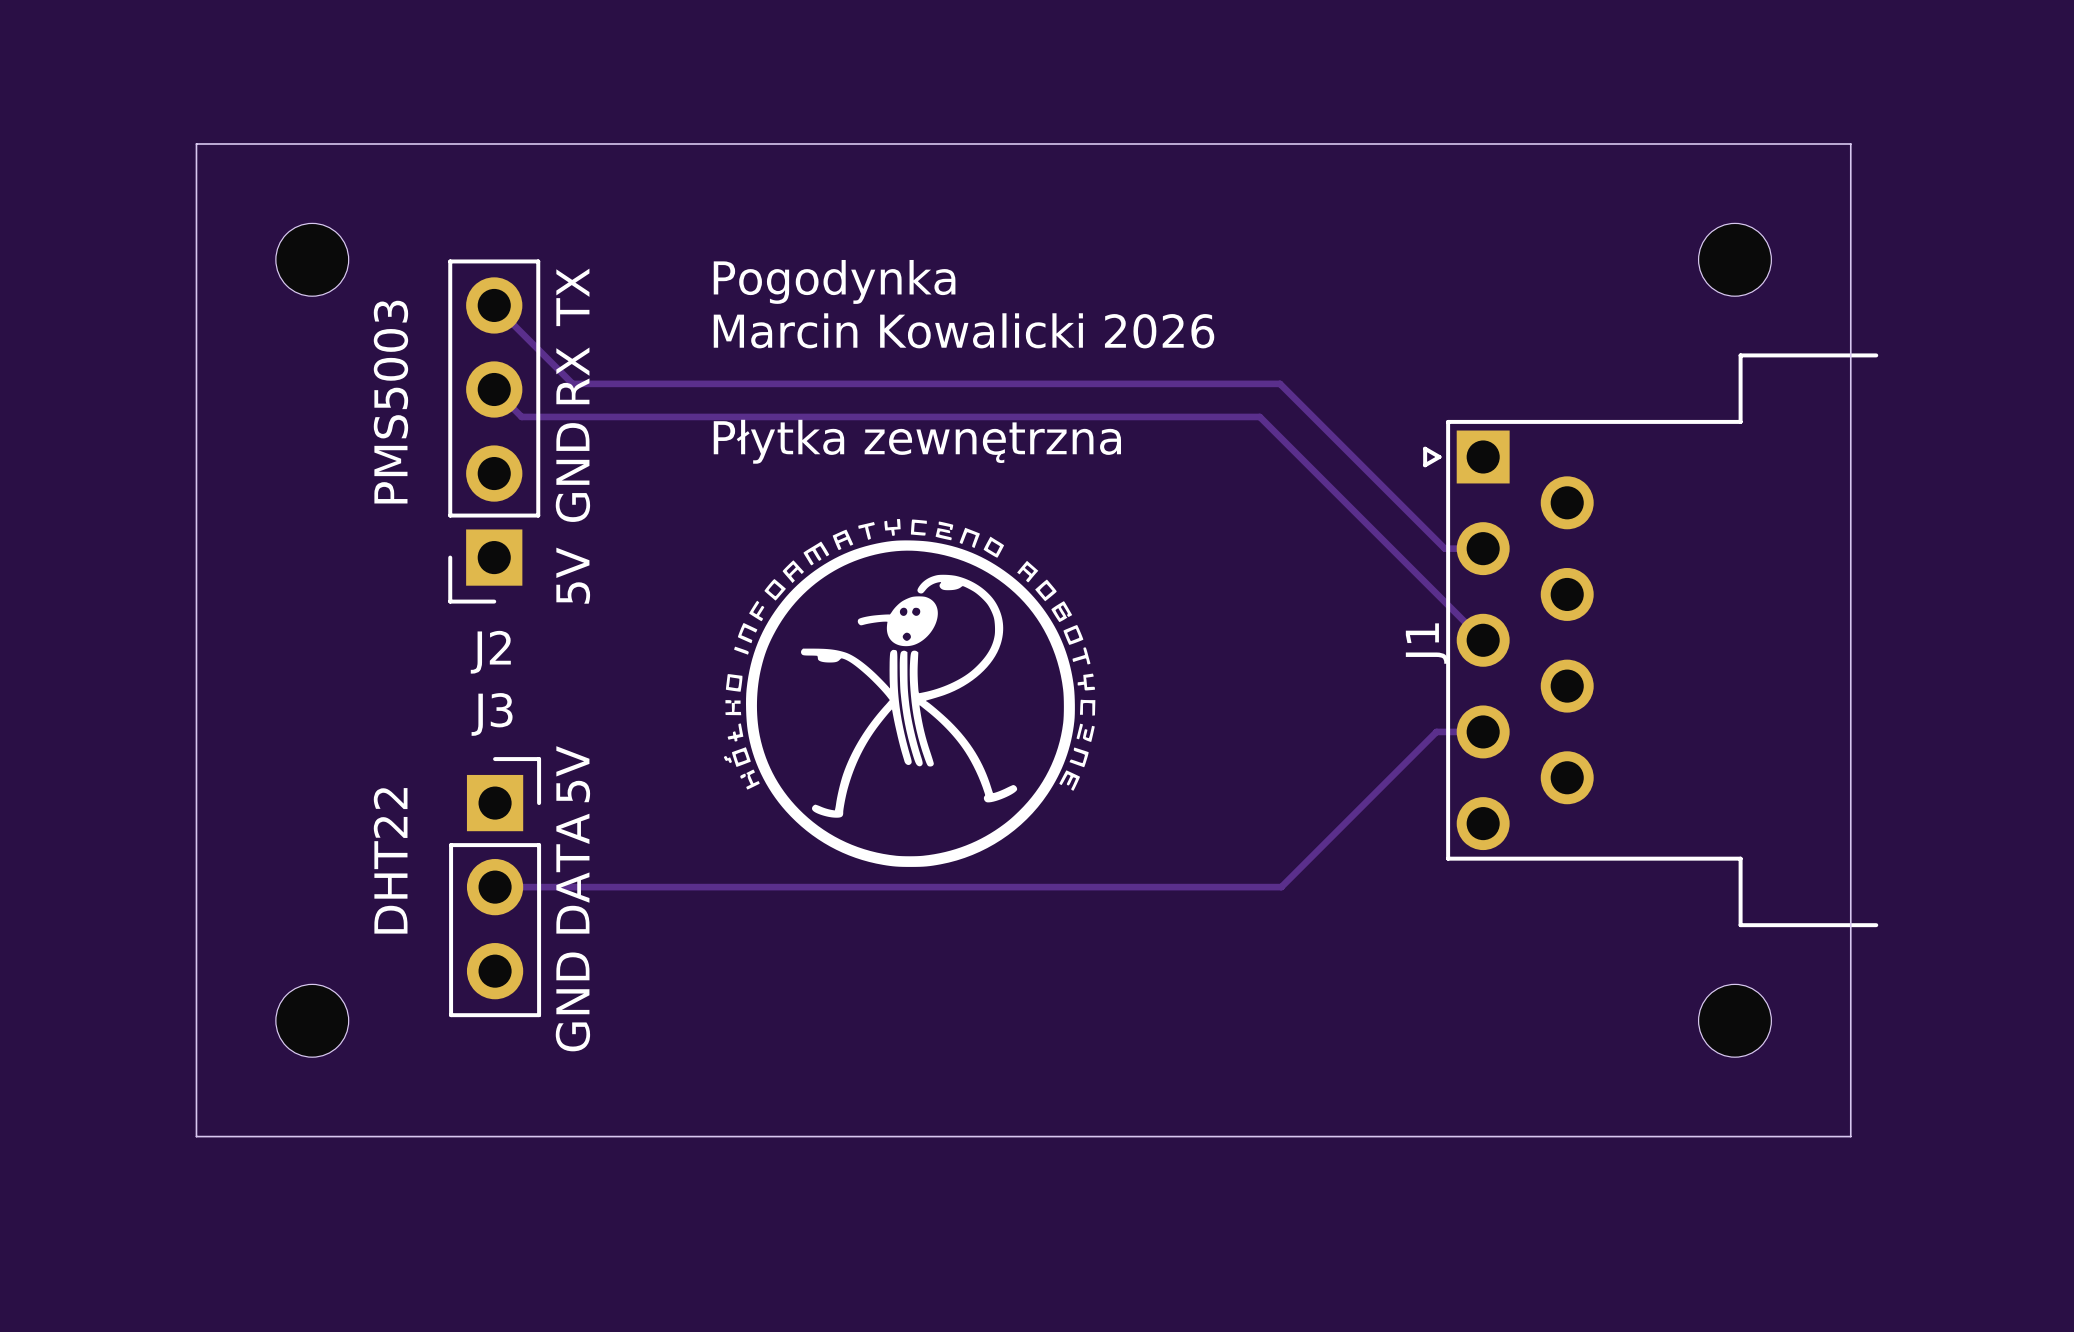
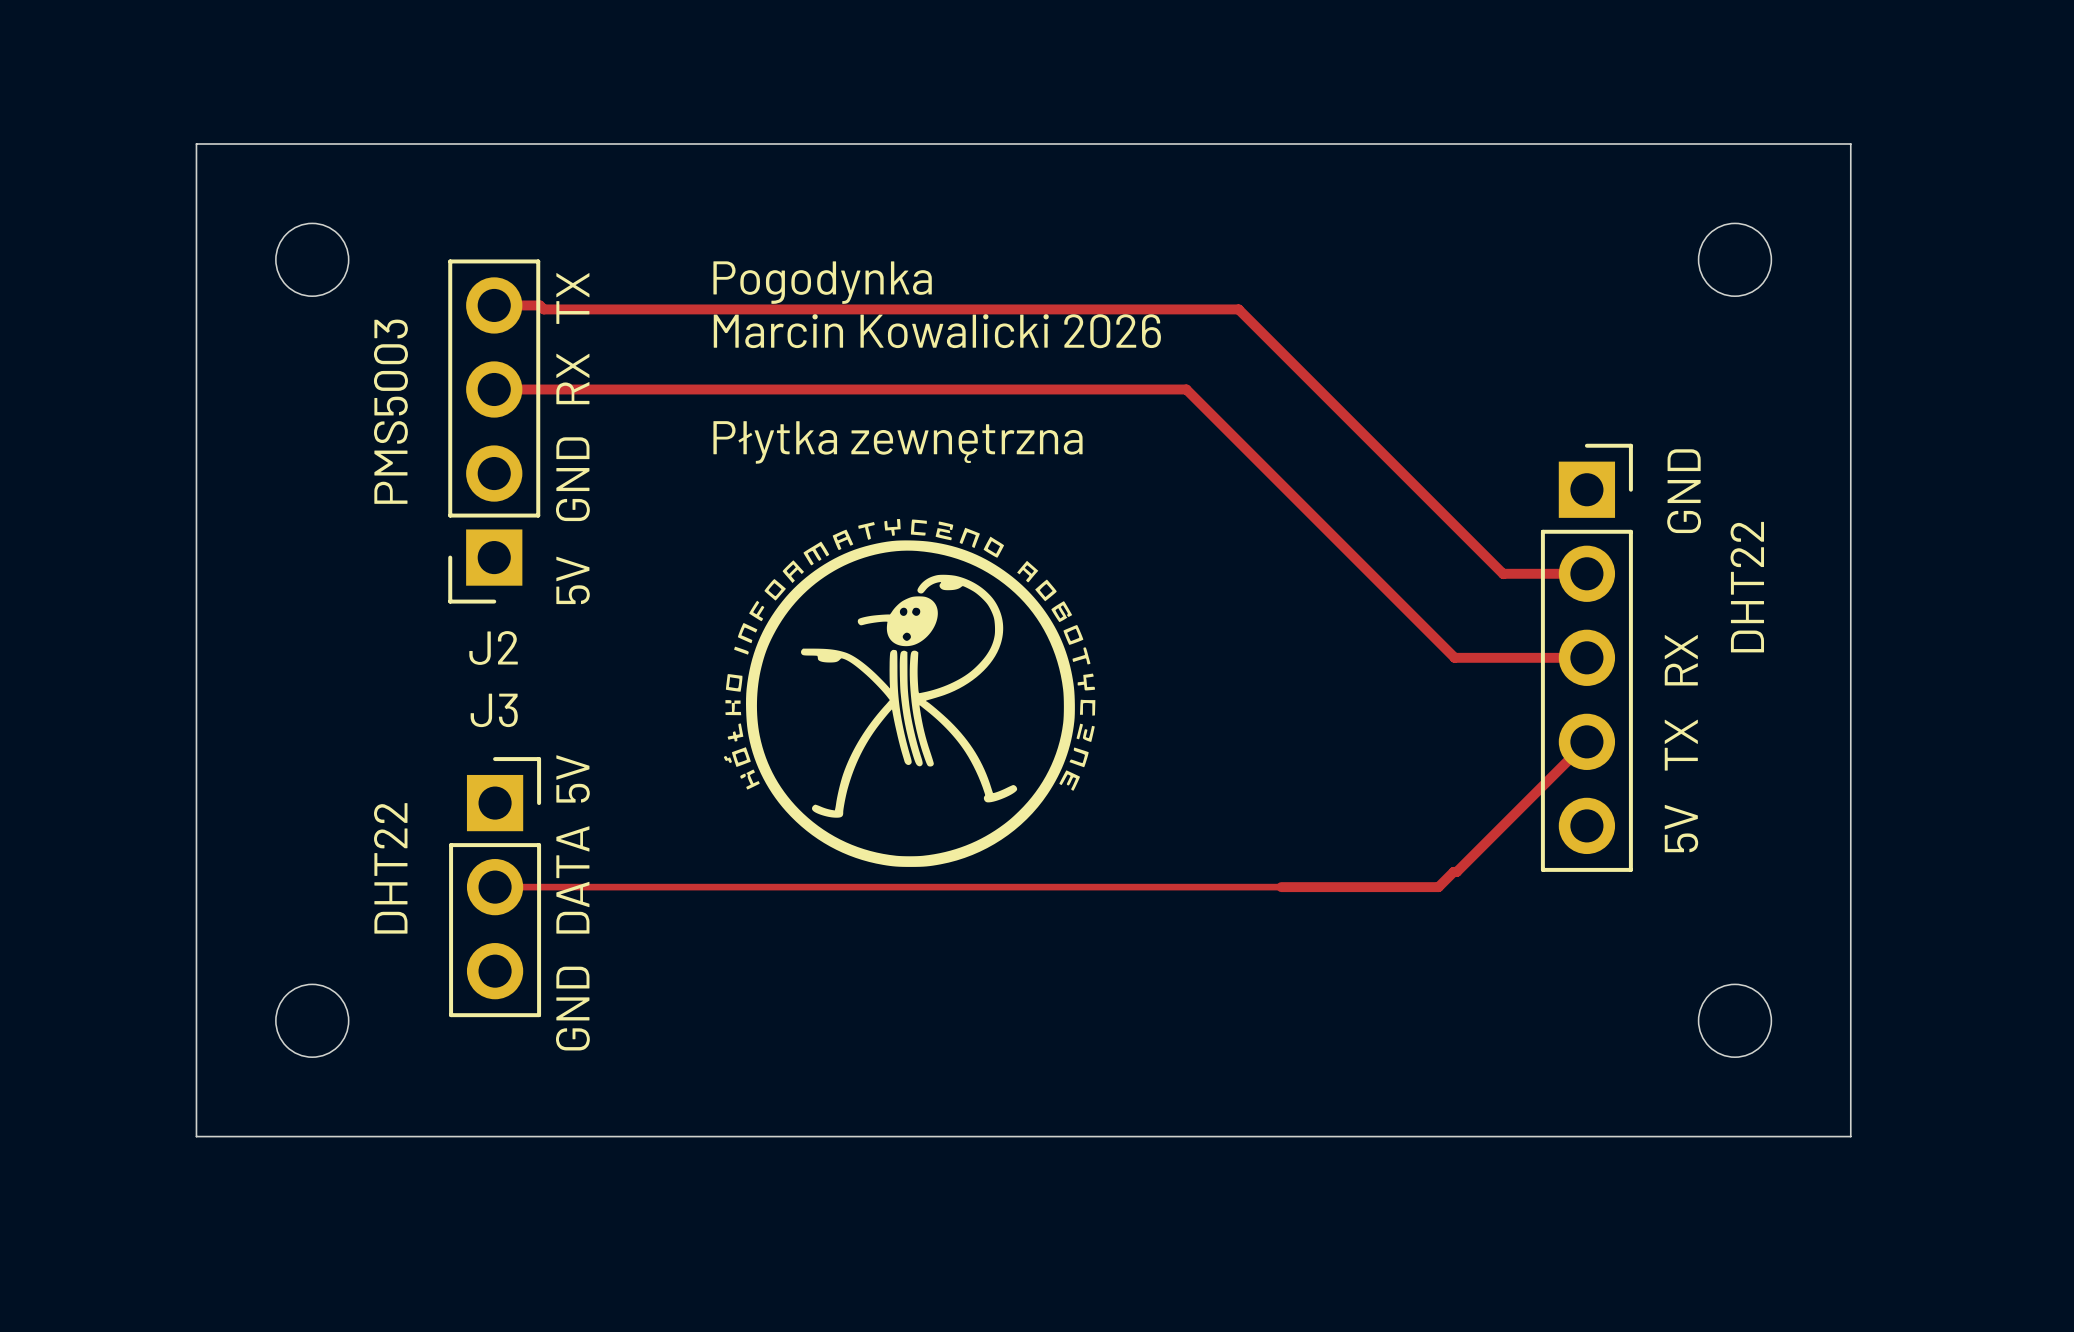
track: (494, 305) (572, 383) (1280, 383) (1444, 548) (1483, 548) -> (494, 305) (539, 305) (543, 309) (1238, 309) (1503, 574)
track: (494, 389) (521, 416) (1259, 416) (1483, 640) -> (494, 389) (1186, 389) (1454, 657) (1586, 657)
track: none -> (1503, 573) (1586, 573)
text: none -> DHT22 (1747, 587)
J1: (1650, 640) -> none
GND: none -> (1586, 657)
text: none -> RX (1681, 660)
track: (1483, 731) (1436, 731) (1281, 887) -> (1586, 741) (1456, 871) (1453, 871) (1438, 887) (1281, 887)
text: none -> TX (1681, 745)
text: none -> 5V (1681, 828)

